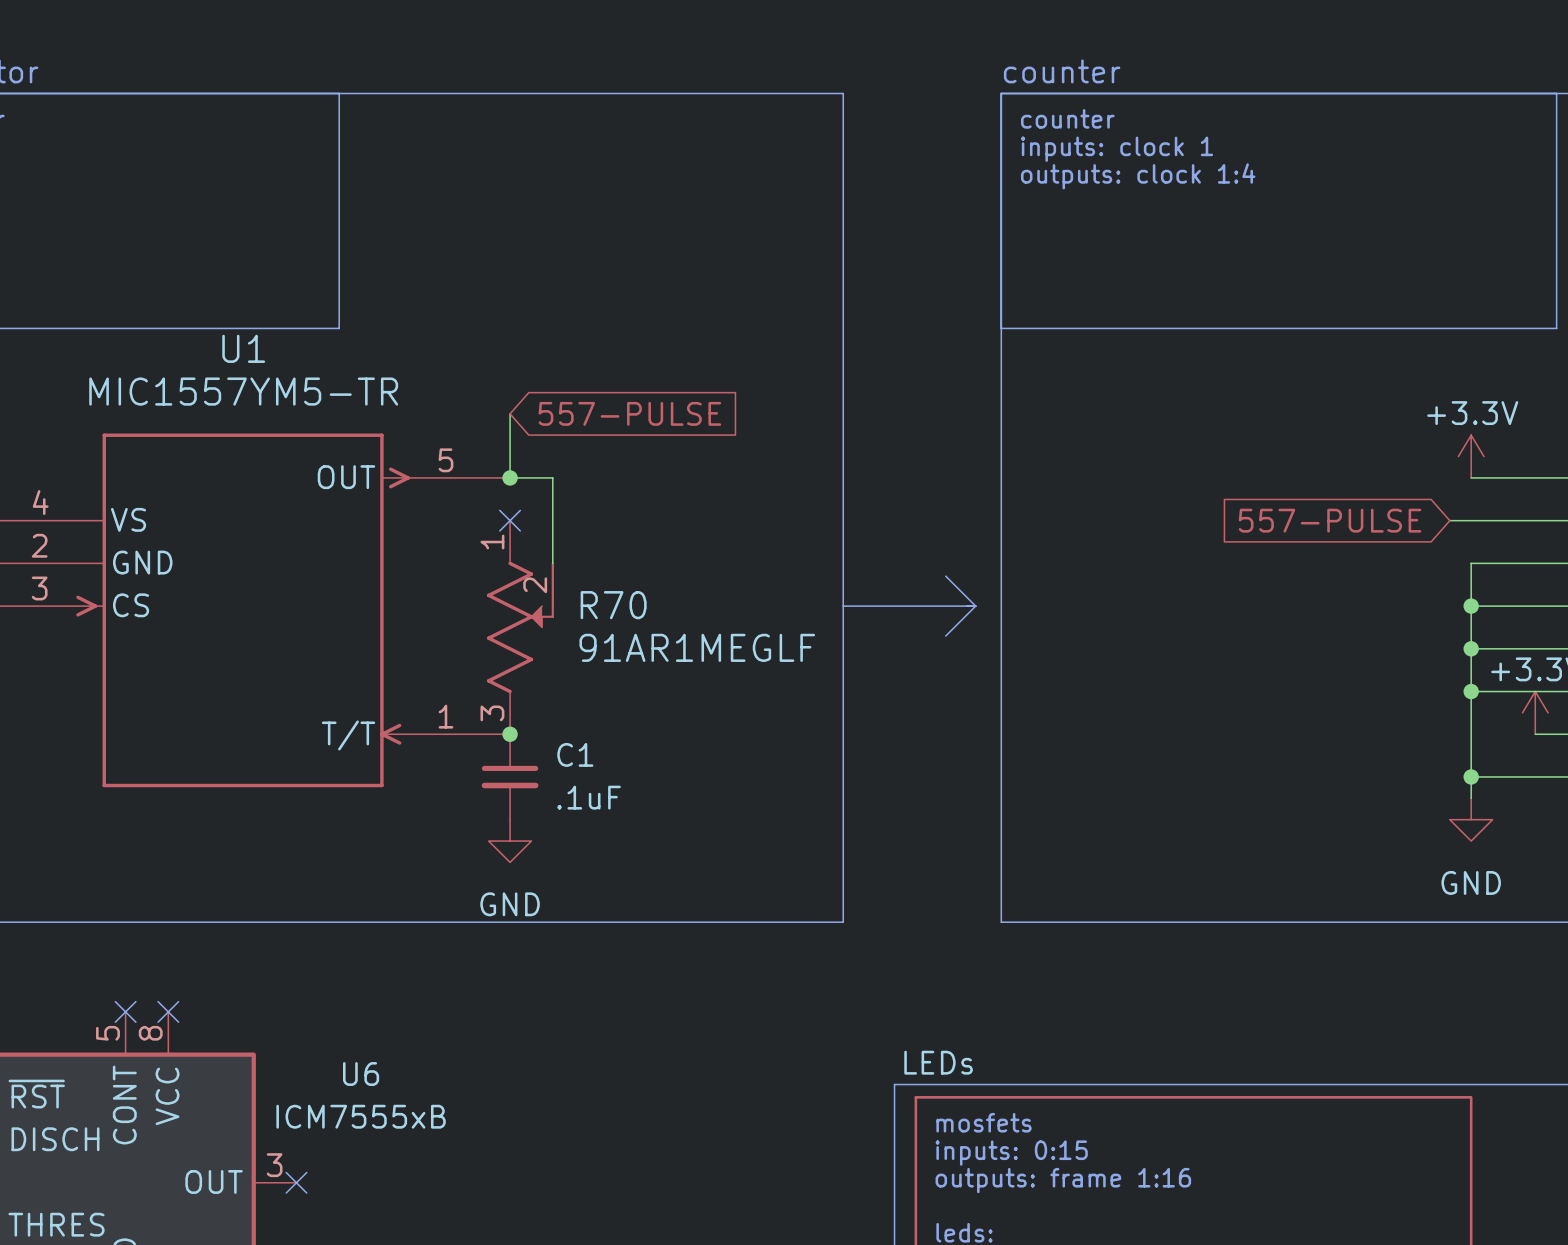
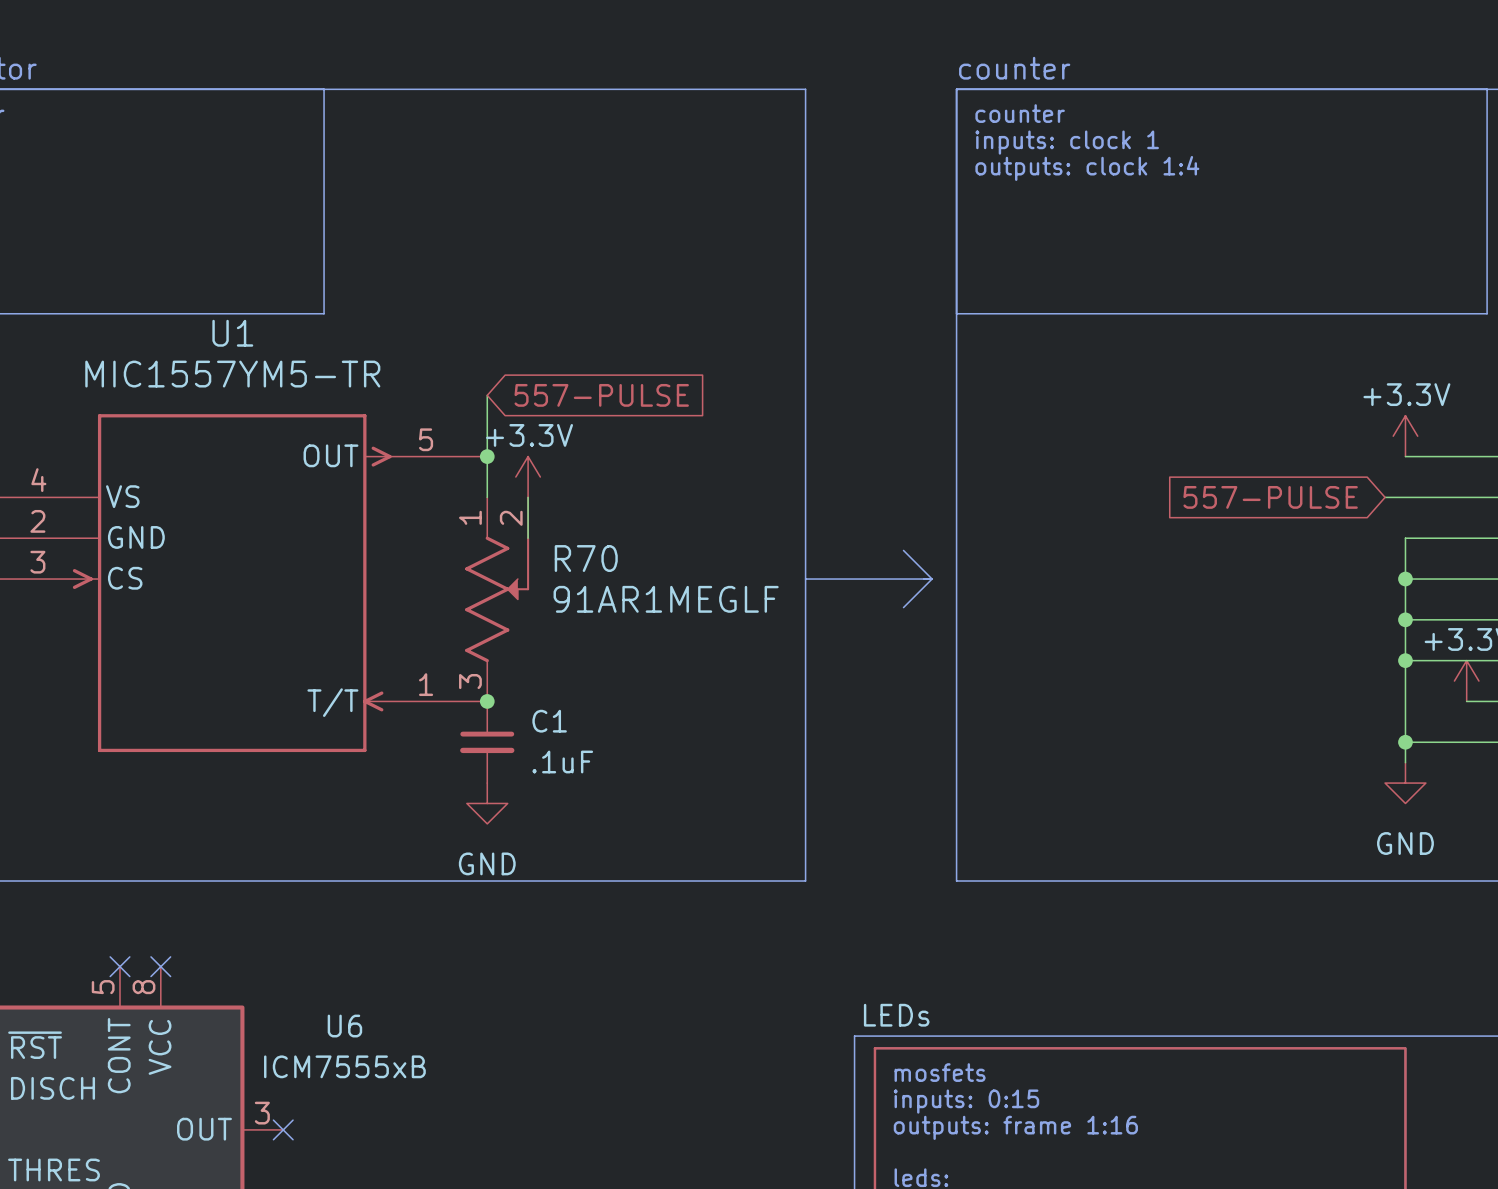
wire: (510, 477) (552, 477) (552, 520) -> (487, 456) (487, 497)
power symbol: none -> +3.3V (528, 477)
R70 symbol: [486, 520, 554, 735] -> [465, 497, 530, 702]
no-connect mark: (510, 520) -> none

